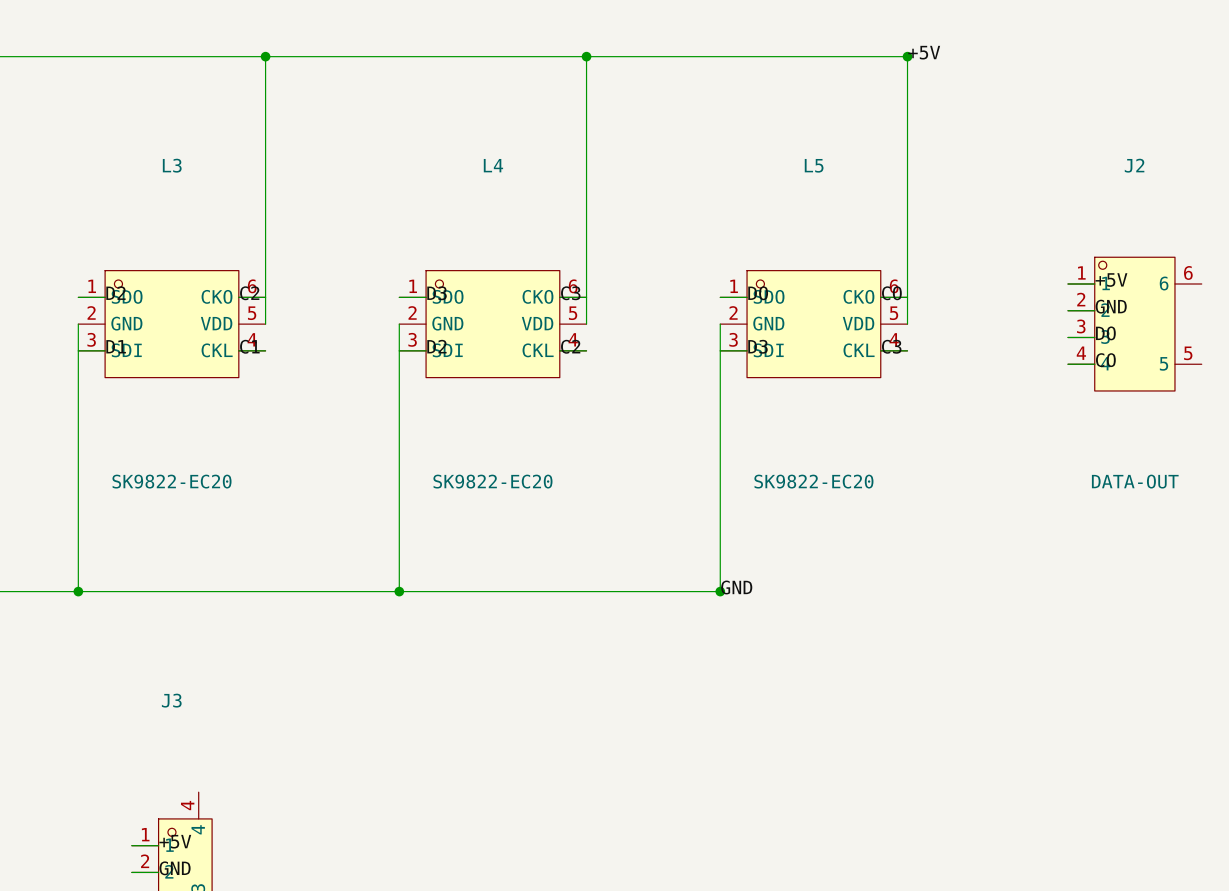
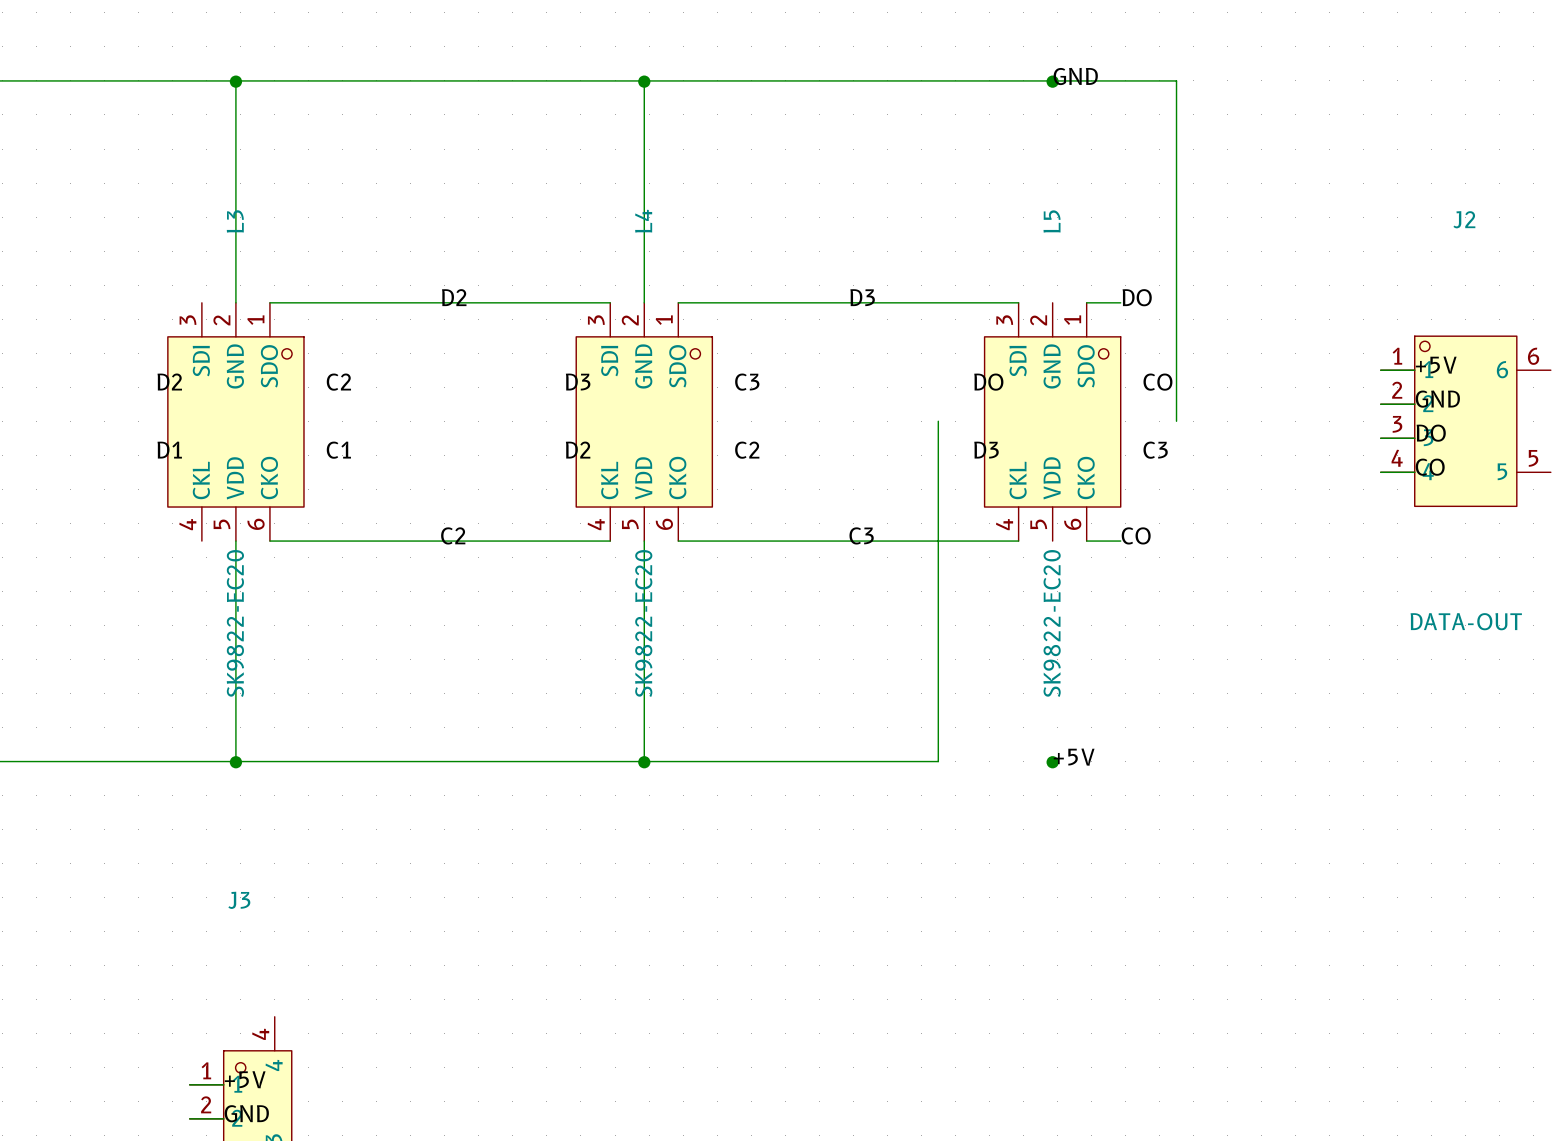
label: +5V (924, 52) -> none
label: none -> GND (1075, 76)
wire: (265, 56) (265, 324) -> none
junction: (265, 56) -> none
wire: (586, 56) (586, 324) -> none
junction: (586, 56) -> none
junction: (907, 56) -> none
wire: none -> (235, 81) (235, 302)
junction: none -> (235, 81)
wire: none -> (644, 81) (644, 302)
junction: none -> (644, 81)
junction: none -> (1052, 81)
label: none -> D2 (454, 297)
label: none -> D3 (862, 297)
label: none -> DO (1137, 297)
wire: none -> (269, 302) (610, 302)
wire: none -> (678, 302) (1018, 302)
wire: (78, 297) (105, 297) -> none
wire: (238, 297) (265, 297) -> none
wire: (399, 297) (426, 297) -> none
wire: (559, 297) (586, 297) -> none
wire: (720, 297) (747, 297) -> none
wire: (880, 297) (907, 297) -> (1086, 302) (1120, 302)
wire: (78, 324) (78, 591) -> none
L3 rotation: 0° (171, 324) -> 90° clockwise (235, 421)
wire: (399, 324) (399, 591) -> none
L4 rotation: 0° (492, 324) -> 90° clockwise (644, 421)
L5 rotation: 0° (813, 324) -> 90° clockwise (1052, 421)
wire: (78, 350) (105, 350) -> none
wire: (238, 350) (265, 350) -> none
wire: (399, 350) (426, 350) -> none
wire: (559, 350) (586, 350) -> none
wire: (720, 350) (747, 350) -> none
wire: (880, 350) (907, 350) -> (1086, 541) (1120, 541)
label: none -> C2 (453, 535)
label: none -> C3 (861, 535)
label: none -> CO (1136, 535)
wire: none -> (235, 541) (235, 762)
wire: none -> (269, 541) (610, 541)
wire: none -> (644, 541) (644, 762)
wire: none -> (678, 541) (1018, 541)
label: GND (736, 587) -> none
label: none -> +5V (1074, 757)
junction: (78, 591) -> none
junction: (399, 591) -> none
junction: (720, 591) -> none
junction: none -> (235, 762)
junction: none -> (644, 762)
junction: none -> (1052, 762)

